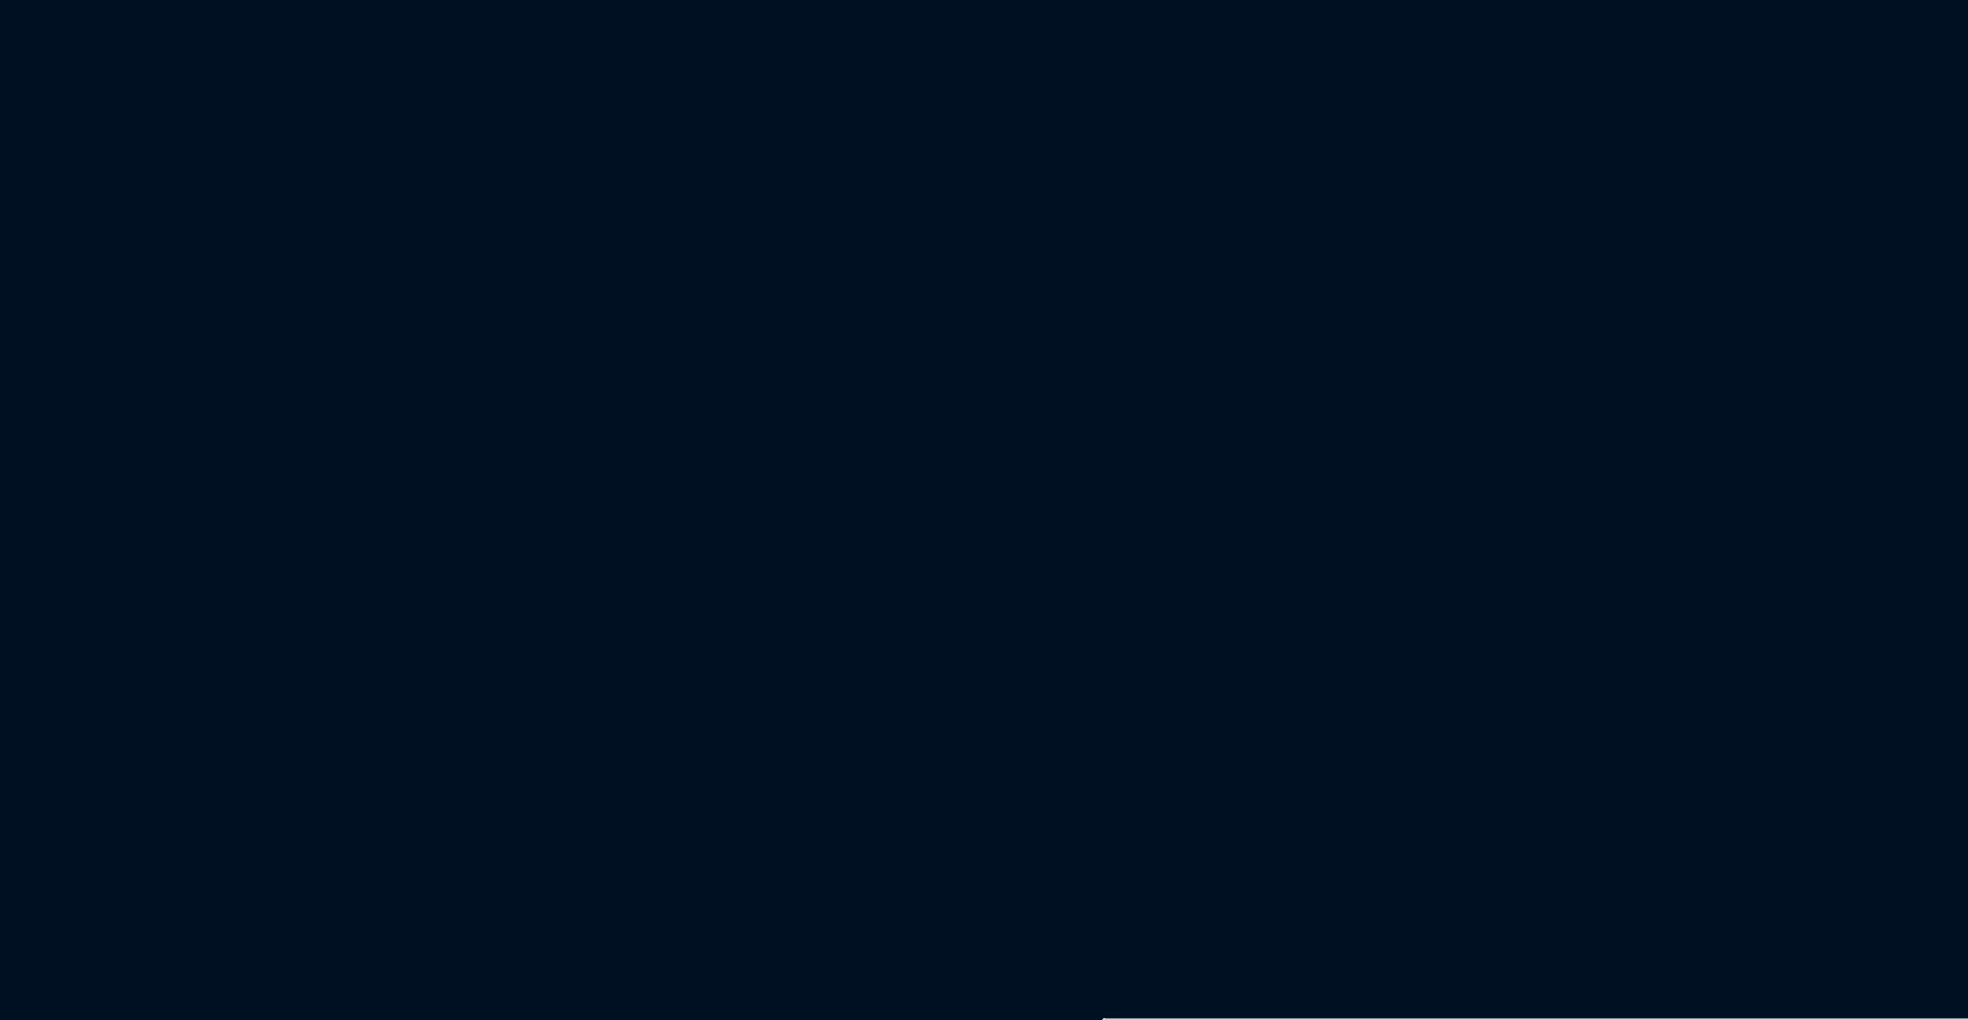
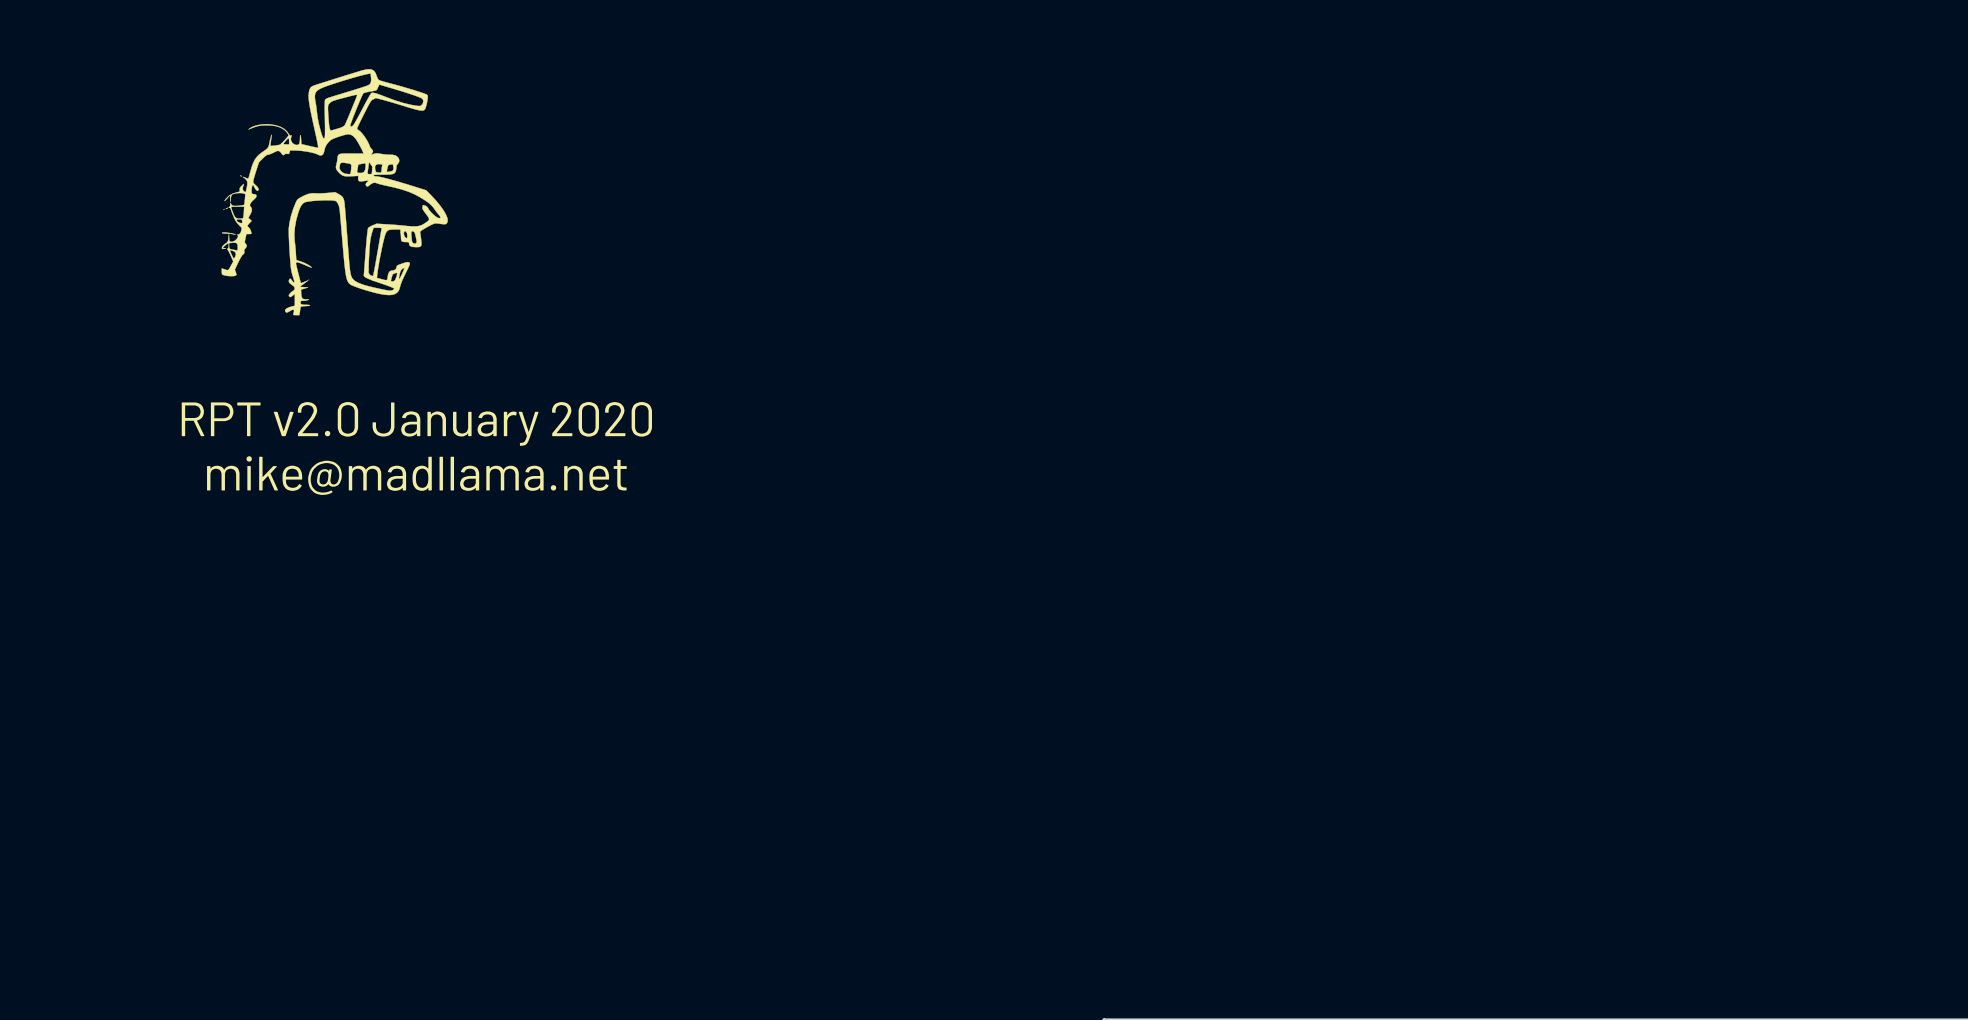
drawing: none -> [221, 69, 448, 316]
text: none -> RPT v2.0 January 2020 (416, 423)
text: none -> mike@madllama.net (416, 475)

